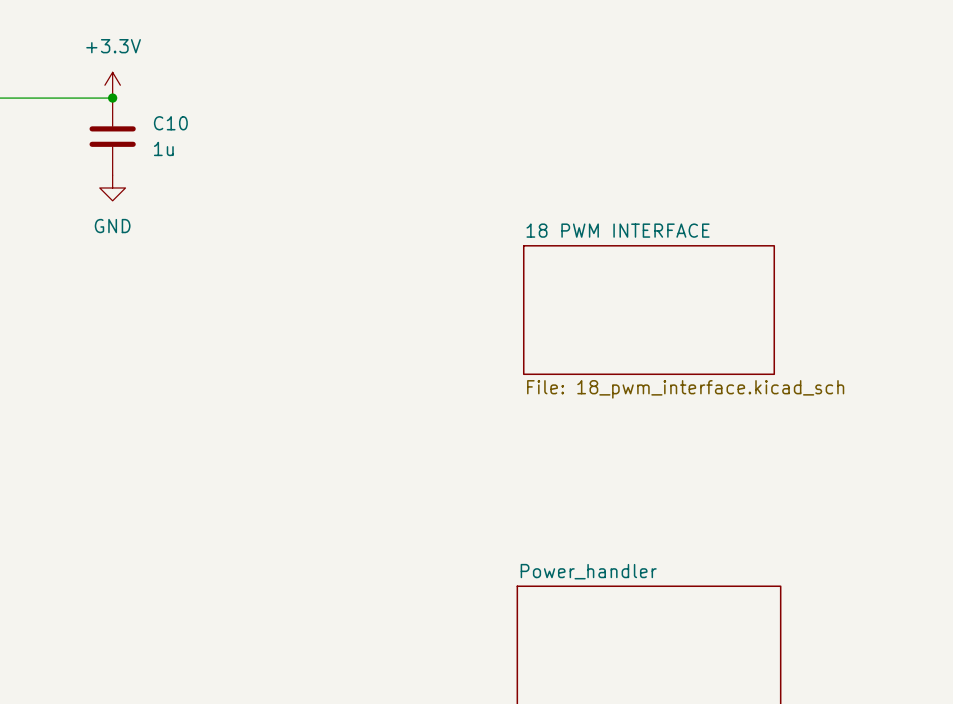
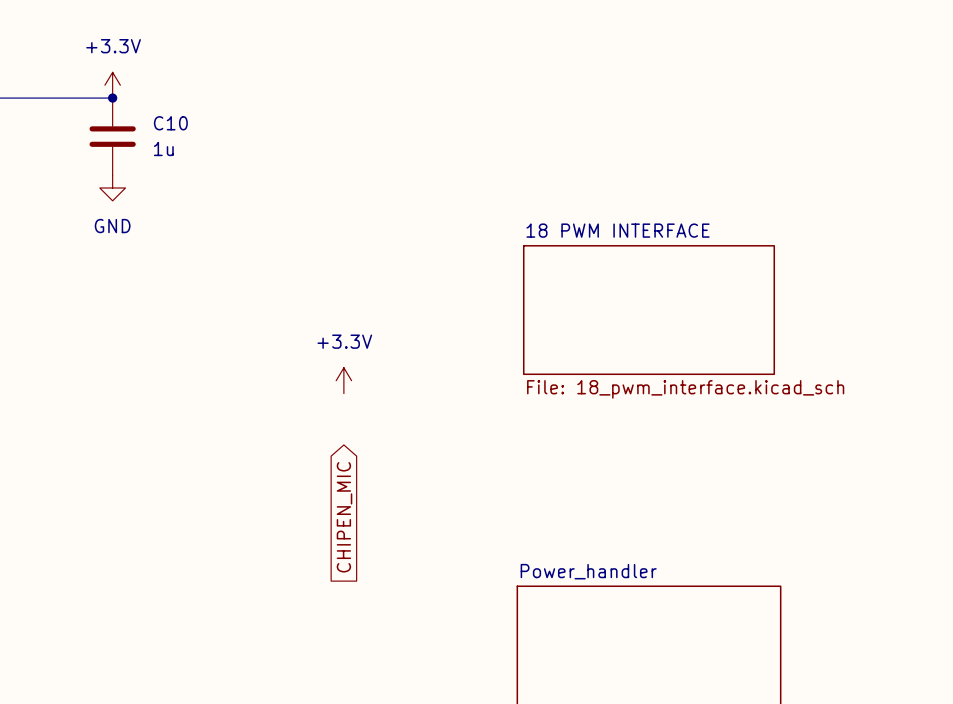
power symbol: none -> +3.3V (343, 380)
global label: none -> CHIPEN_MIC (344, 517)

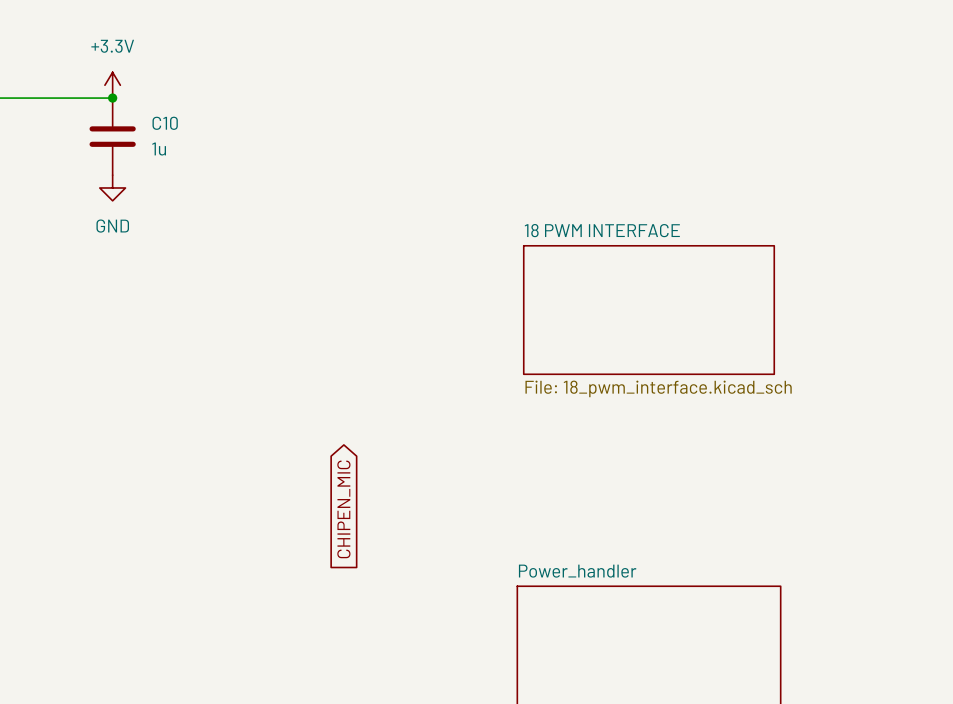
power symbol: +3.3V (343, 380) -> none

